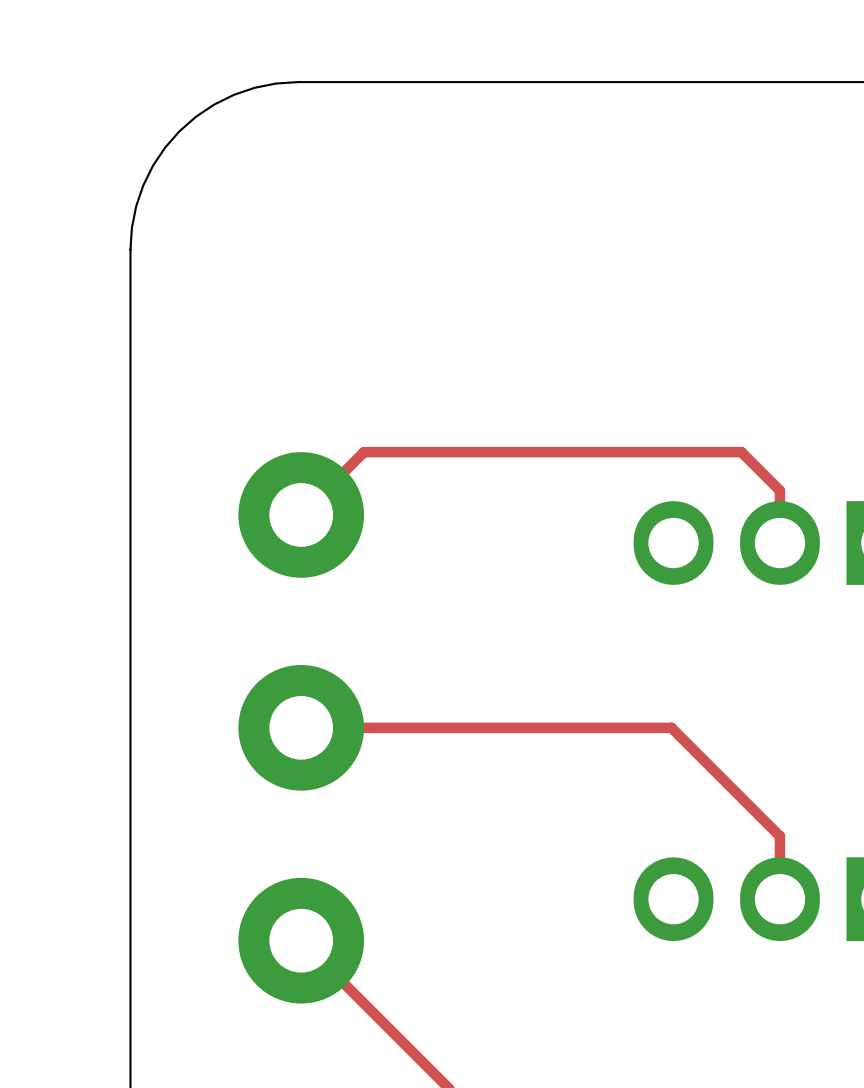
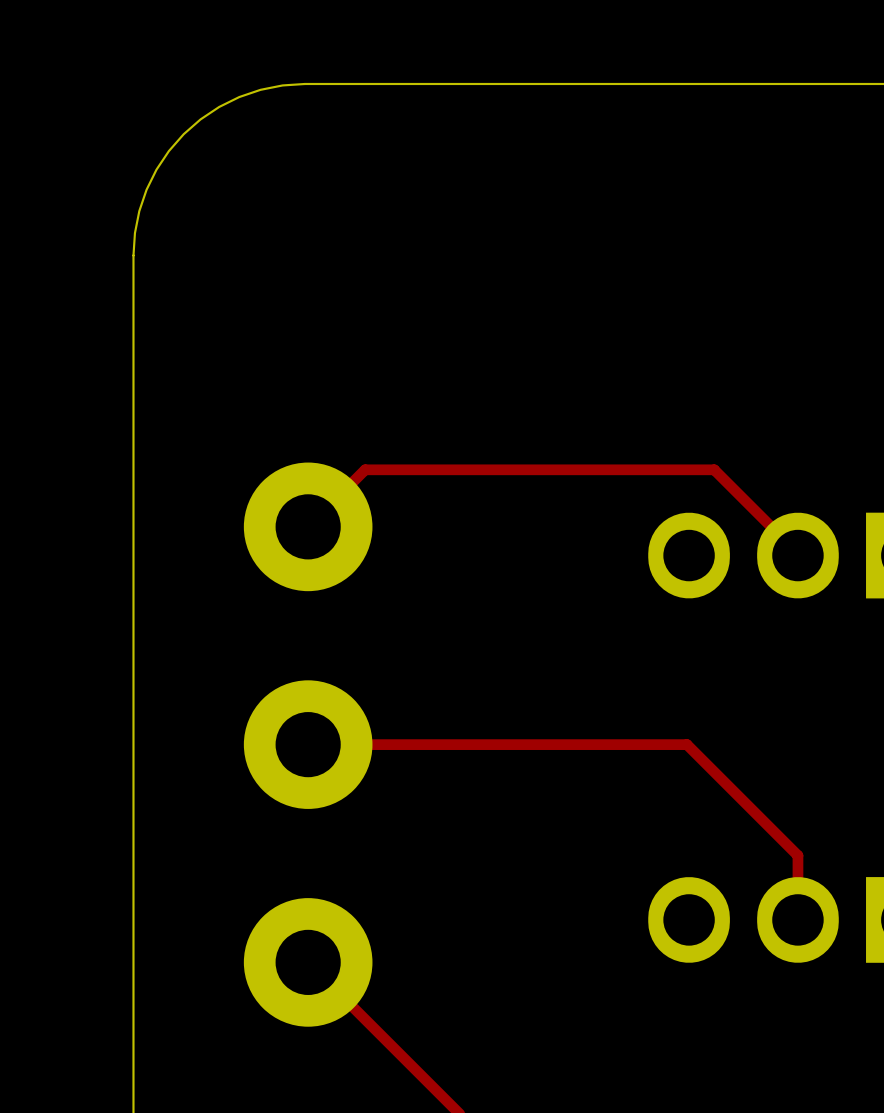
top track: (356, 459) (364, 452) (741, 452) (779, 490) (779, 541) -> (365, 469) (714, 469) (797, 553)

